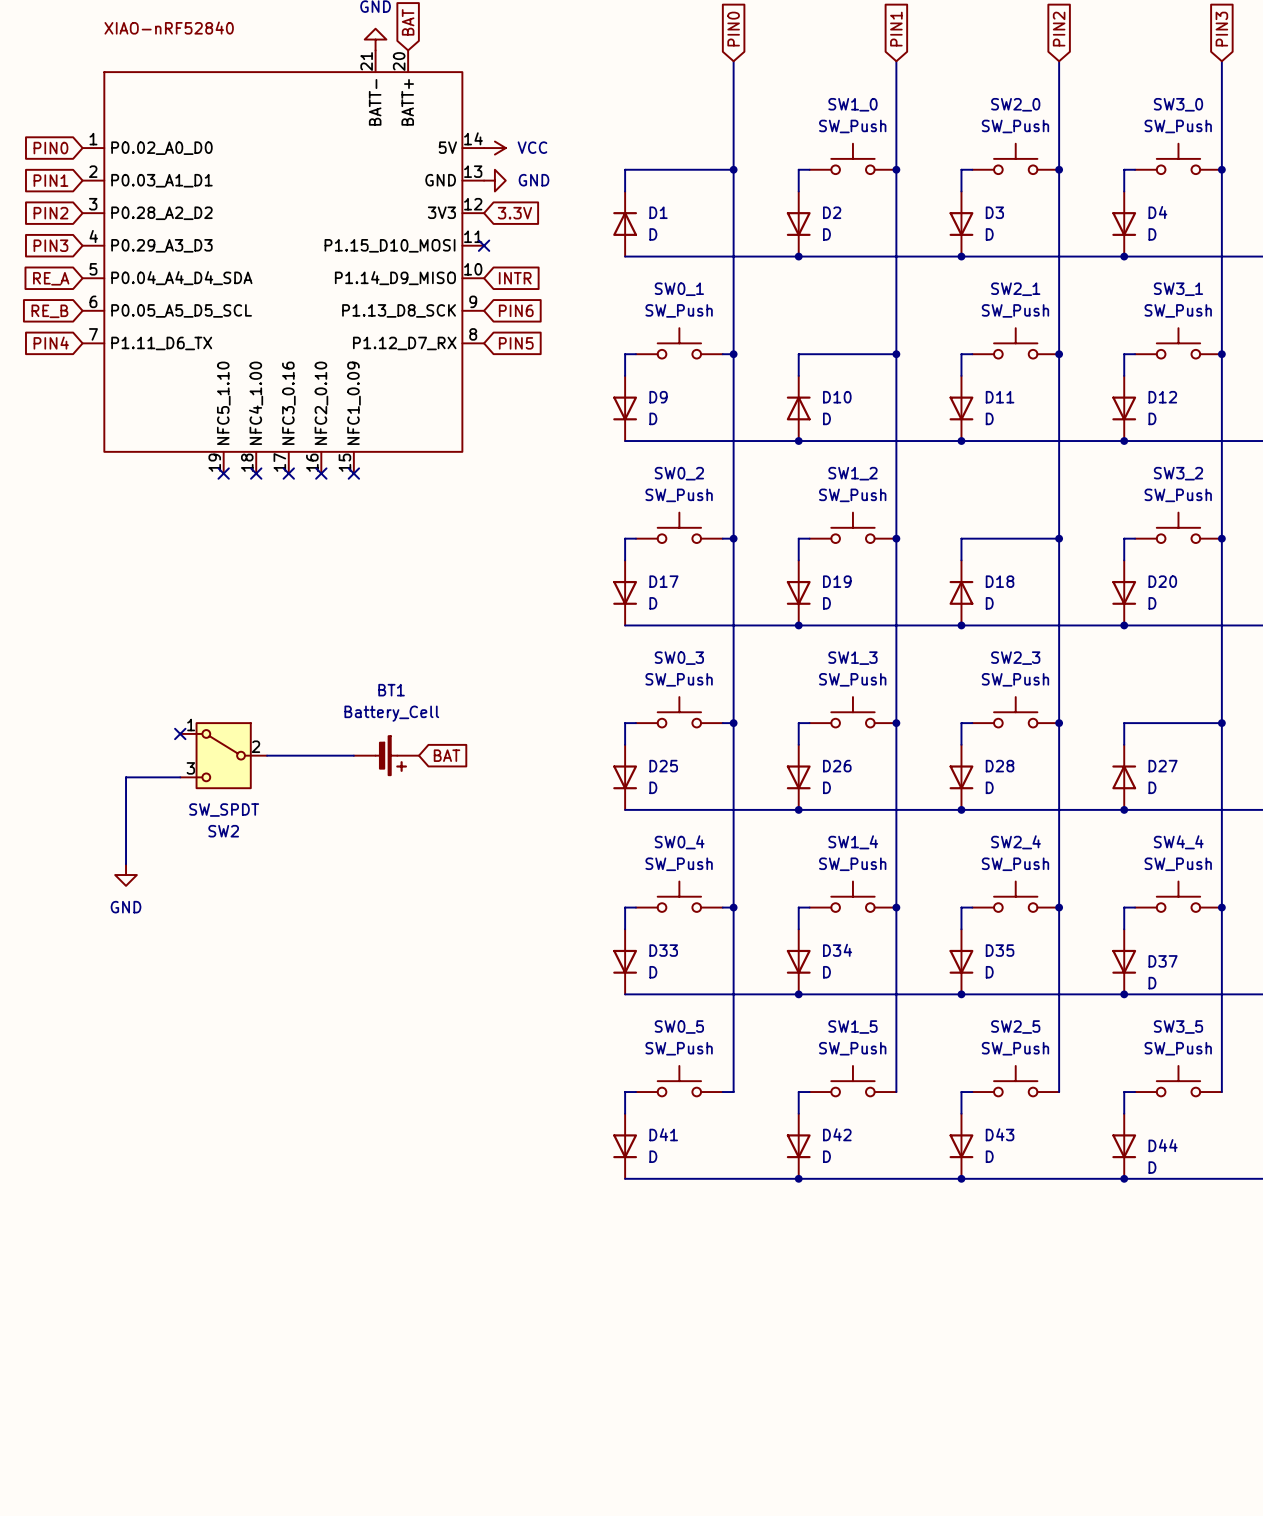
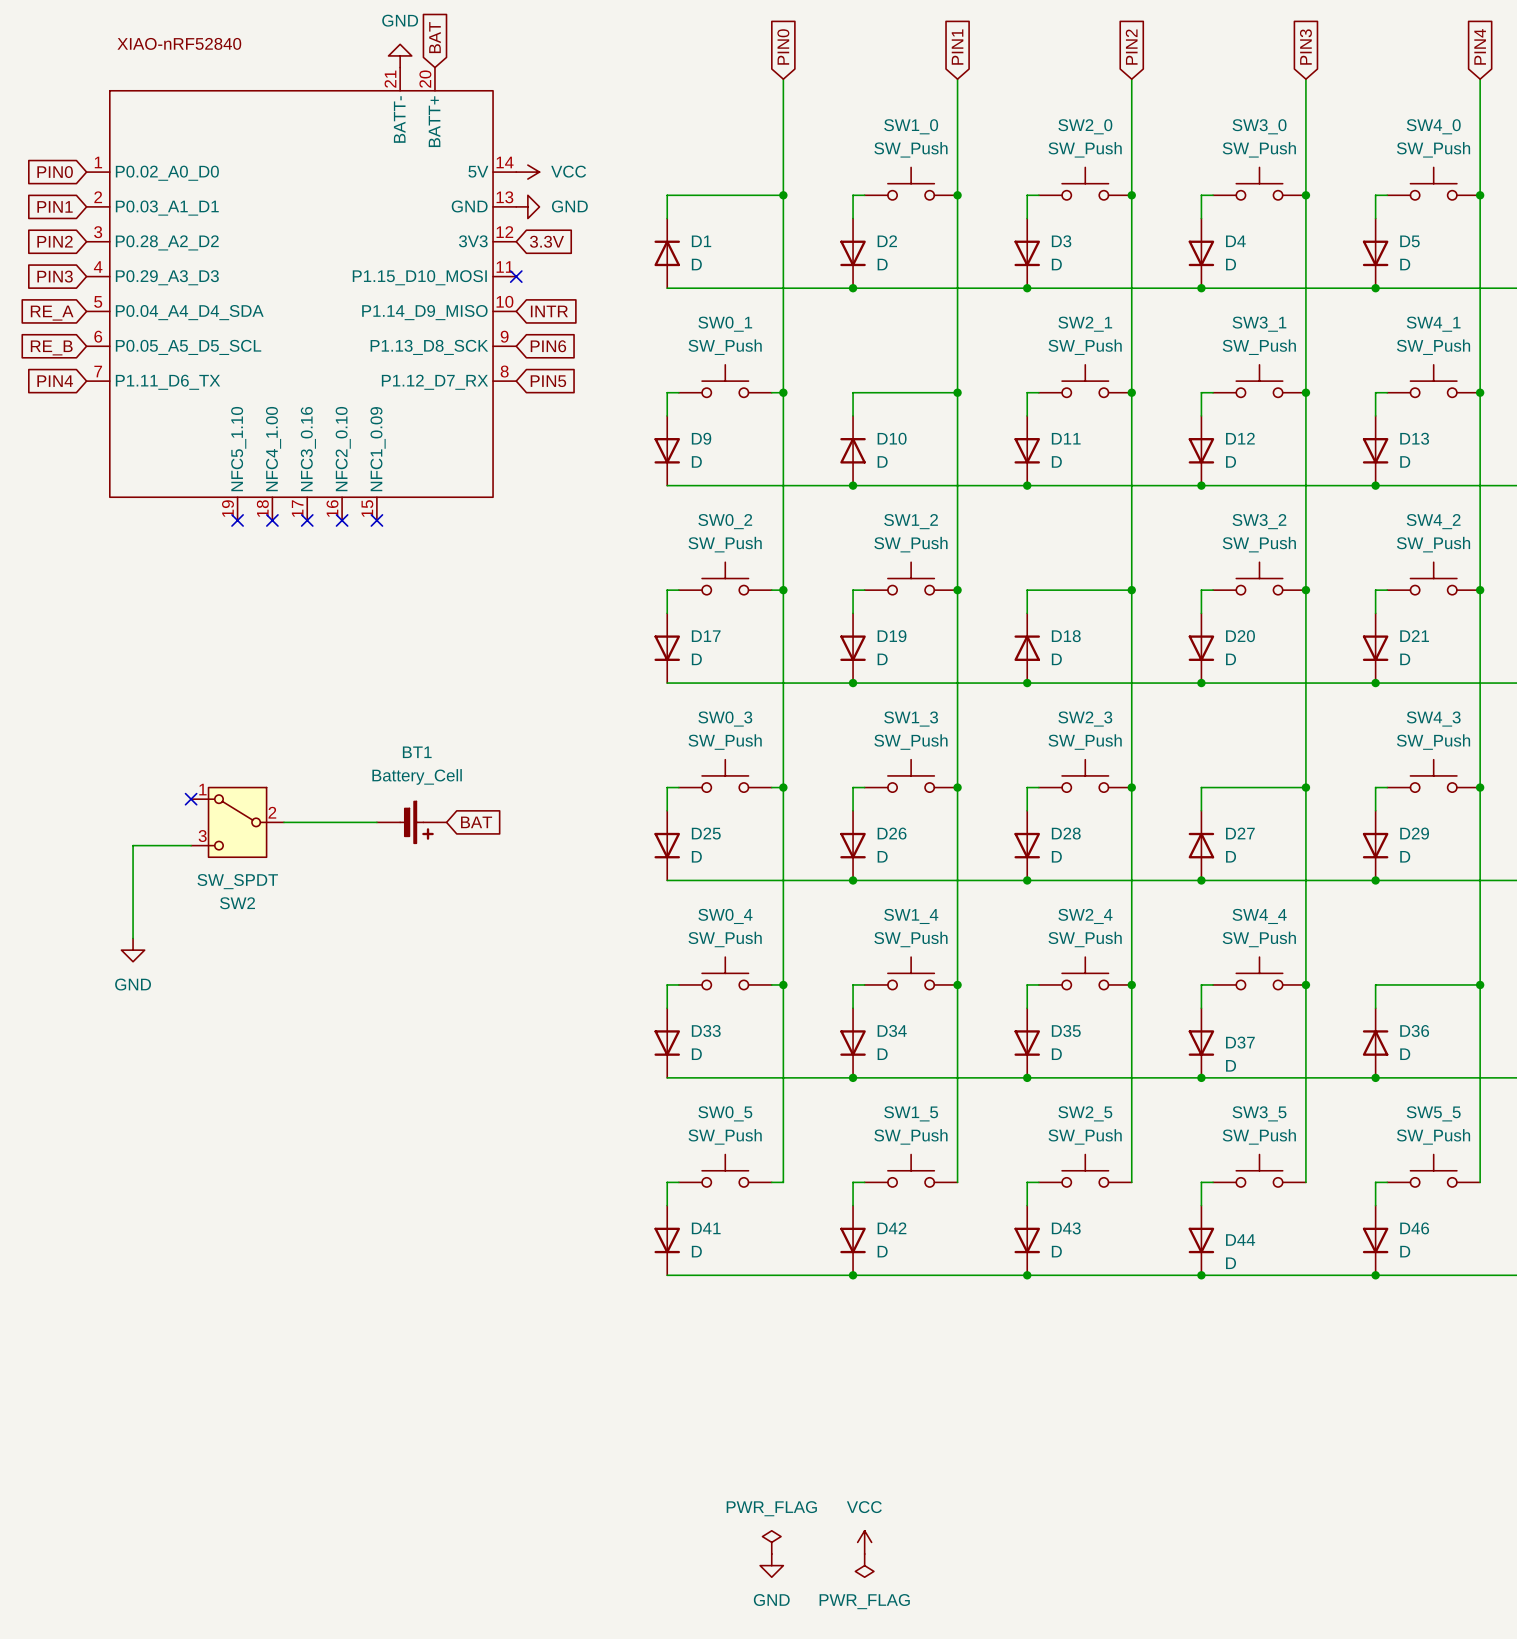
power symbol: none -> PWR_FLAG (771, 1542)
power symbol: none -> VCC (864, 1542)
power symbol: none -> GND (771, 1565)
power symbol: none -> PWR_FLAG (864, 1565)

